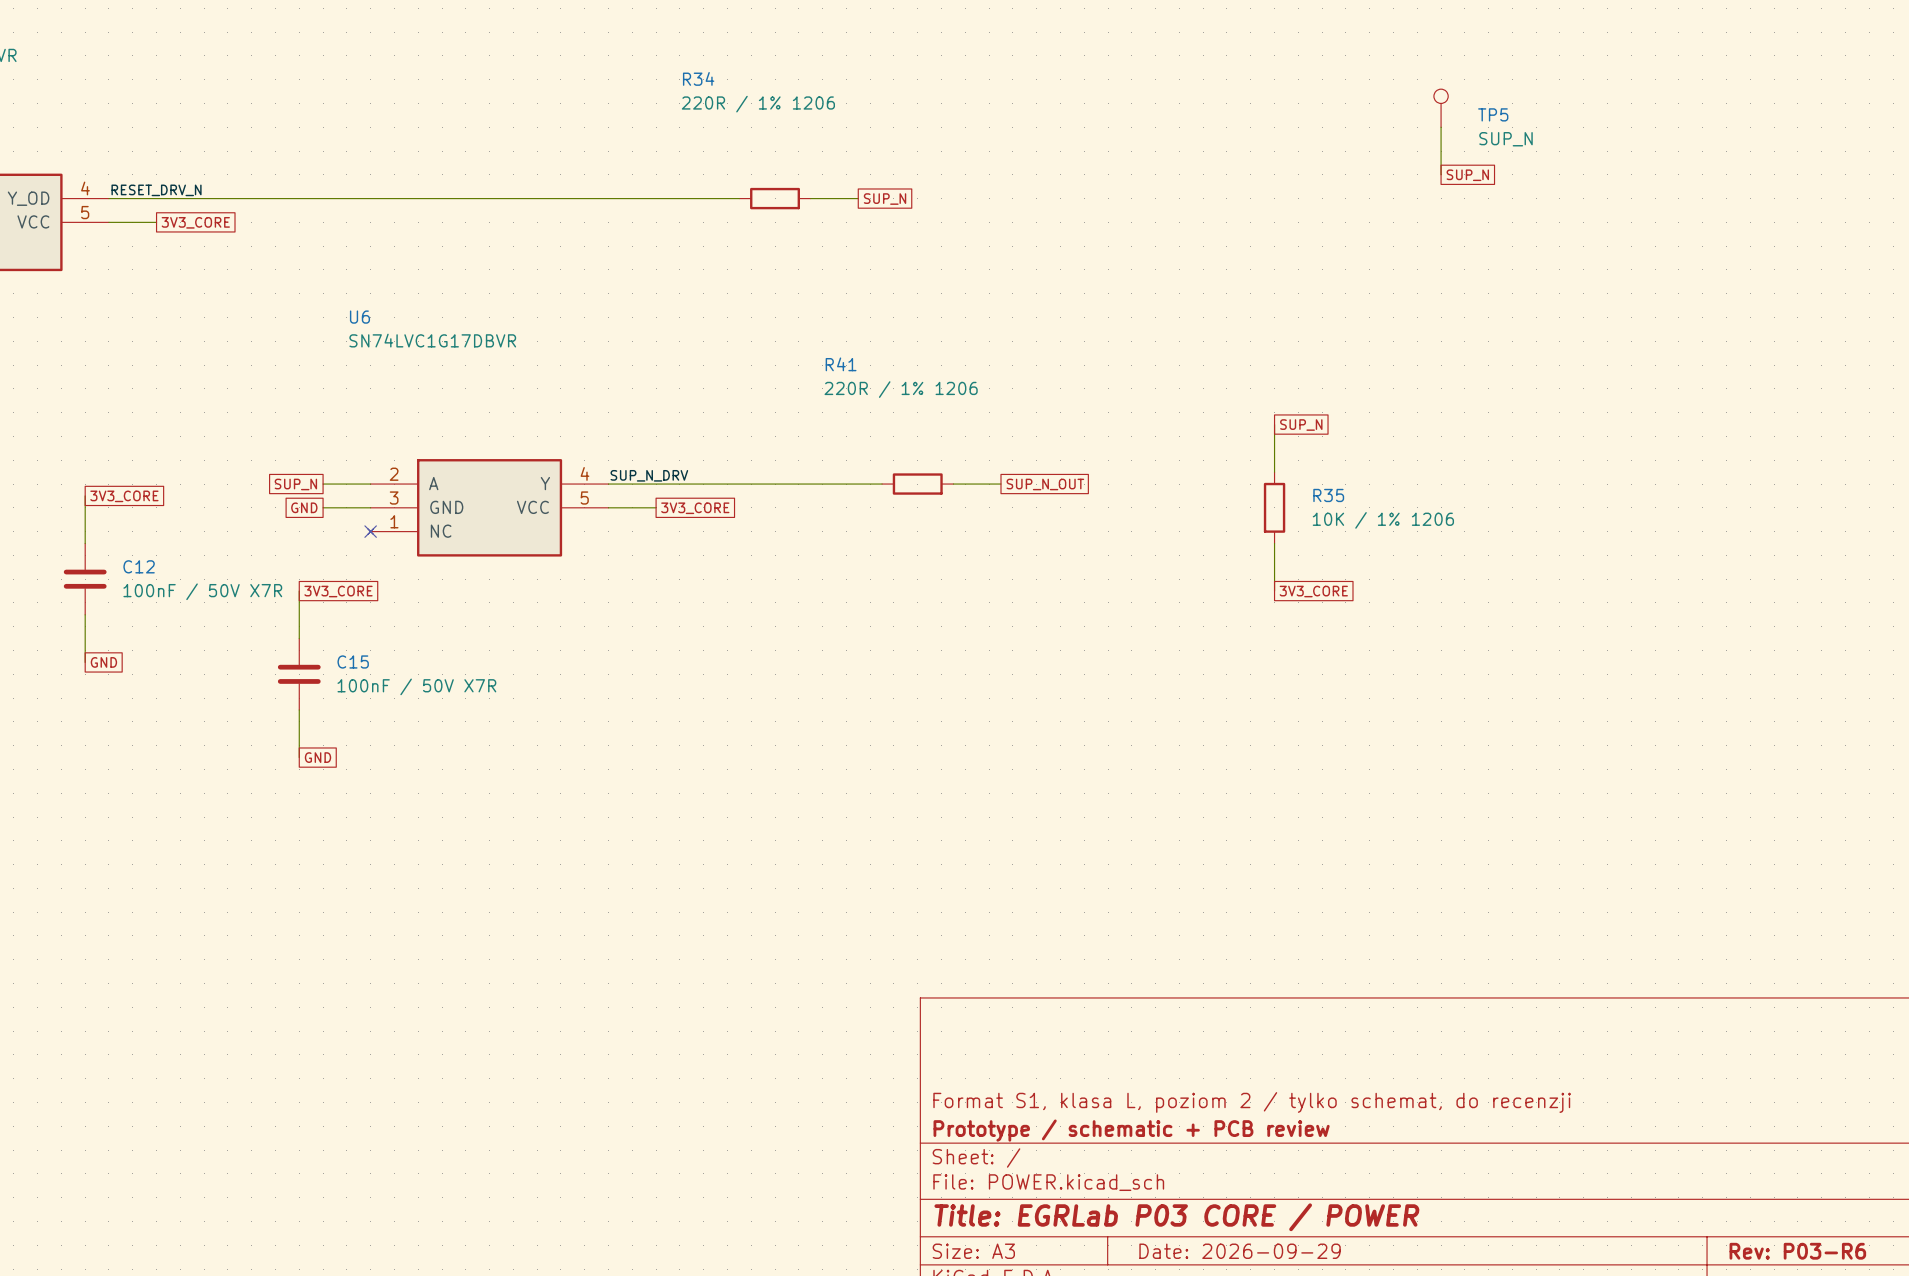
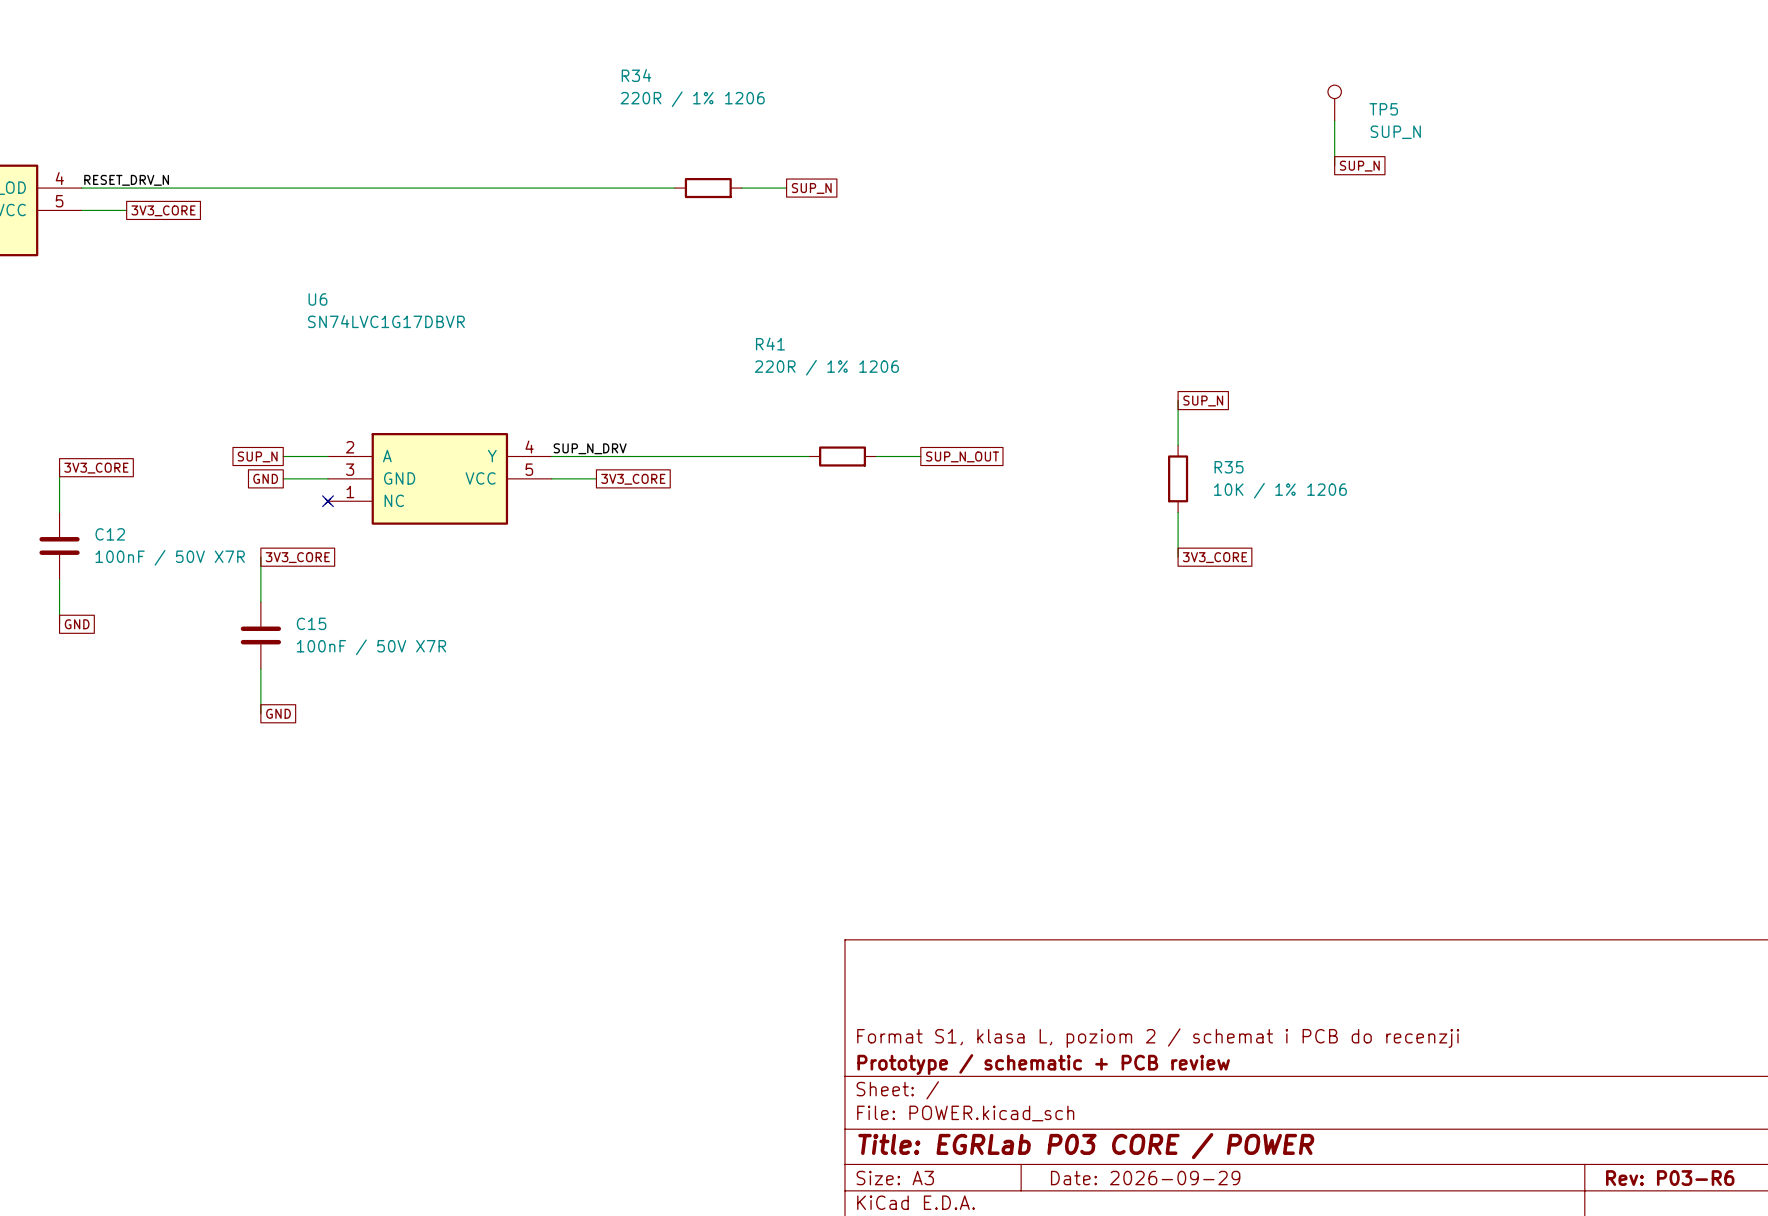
title block: Format S1, klasa L, poziom 2 / tylko schemat, do recenzji (1252, 1102) -> Format S1, klasa L, poziom 2 / schemat i PCB do recenzji (1158, 1038)

